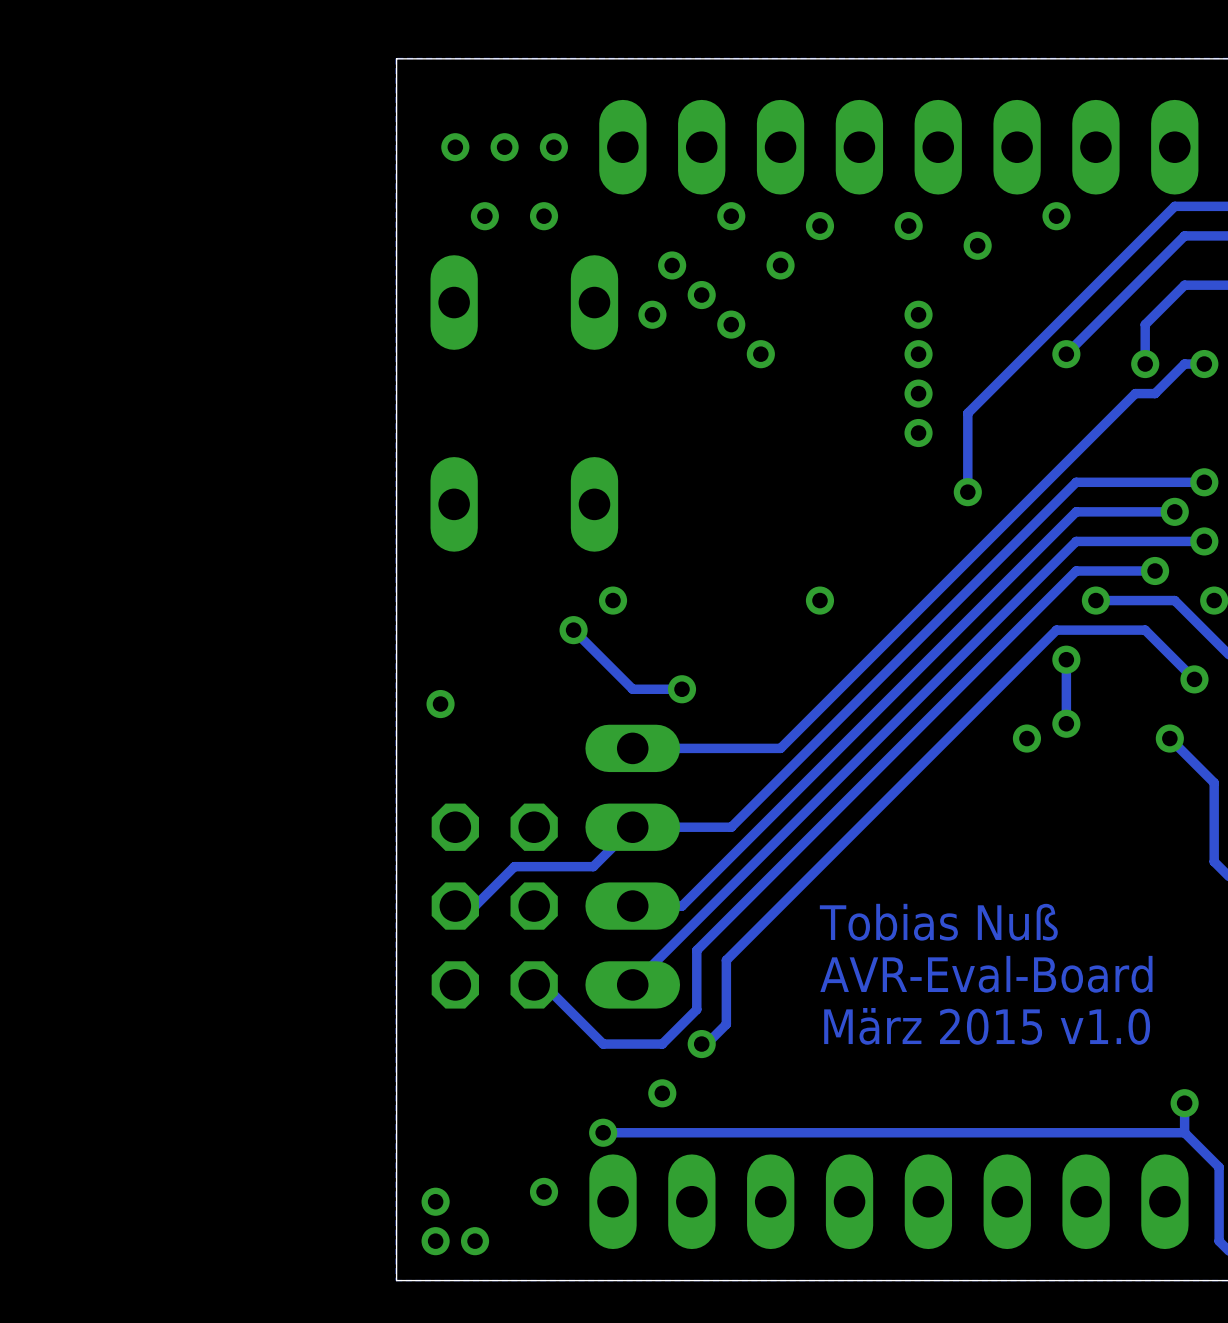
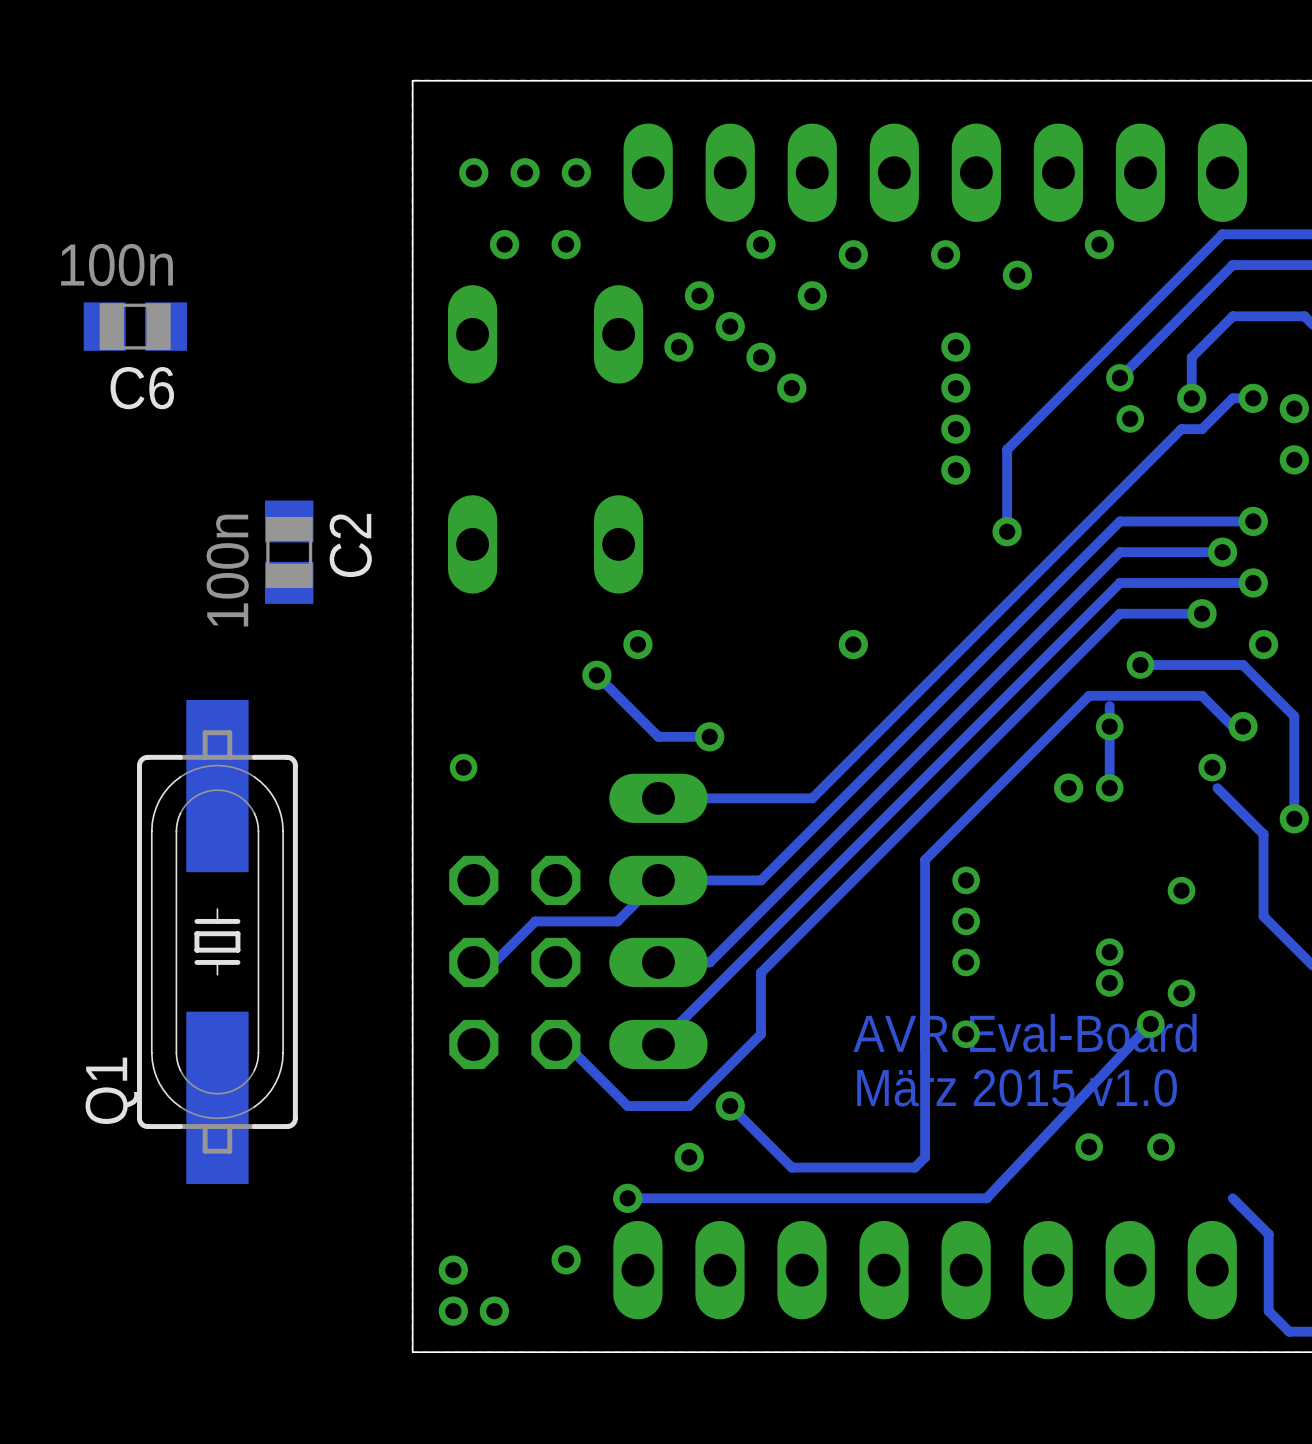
C6: none -> 100n (135, 326)
via position: (1066, 354) -> (1119, 377)
via: none -> (1130, 418)
C2: none -> 100n (289, 552)
track: (1095, 600) (1174, 600) (1194, 620) -> (1140, 665) (1243, 665)
via position: (1095, 600) -> (1140, 665)
via position: (1066, 659) -> (1109, 726)
track: (1194, 679) (1145, 630) (1056, 630) (726, 960) (726, 1024) (706, 1044) (701, 1044) -> (1243, 736) (1202, 695) (1089, 695) (925, 859) (925, 1157) (914, 1167) (791, 1167) (730, 1106)
via position: (440, 704) -> (463, 767)
via position: (1066, 723) -> (1109, 788)
via position: (1169, 738) -> (1212, 767)
via: none -> (966, 880)
via: none -> (1181, 890)
via: none -> (966, 921)
Q1: none -> (217, 941)
via: none -> (1109, 952)
via: none -> (966, 962)
track: (731, 915) (696, 950) (696, 1009) -> (761, 972) (761, 1034) (725, 1070)
text: Tobias Nuß (938, 922) -> none
via: none -> (1109, 982)
via: none -> (1181, 993)
via: none -> (1150, 1023)
via: none -> (966, 1034)
via: none -> (1089, 1147)
via: none -> (1160, 1147)
track: (1184, 1103) (1184, 1132) (948, 1132) -> (1150, 1023) (986, 1198)
via: (1184, 1103) -> none

